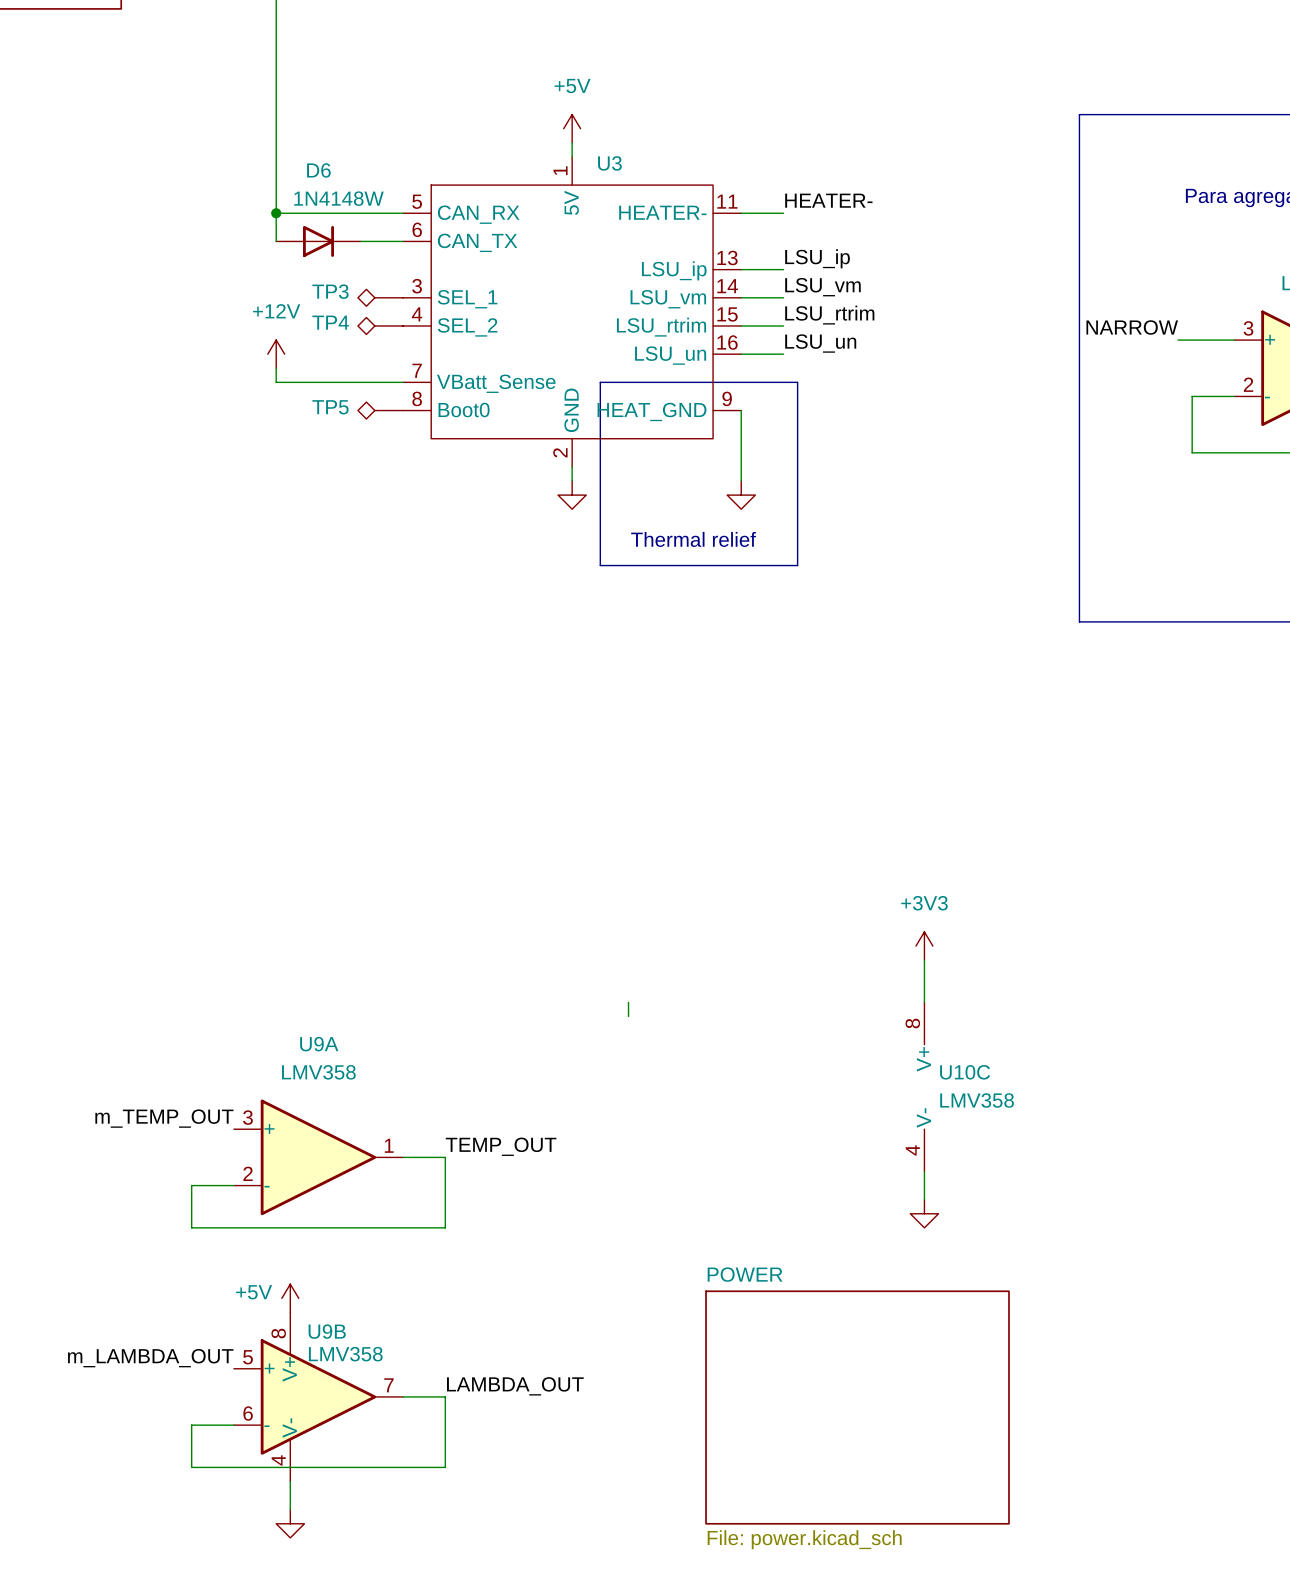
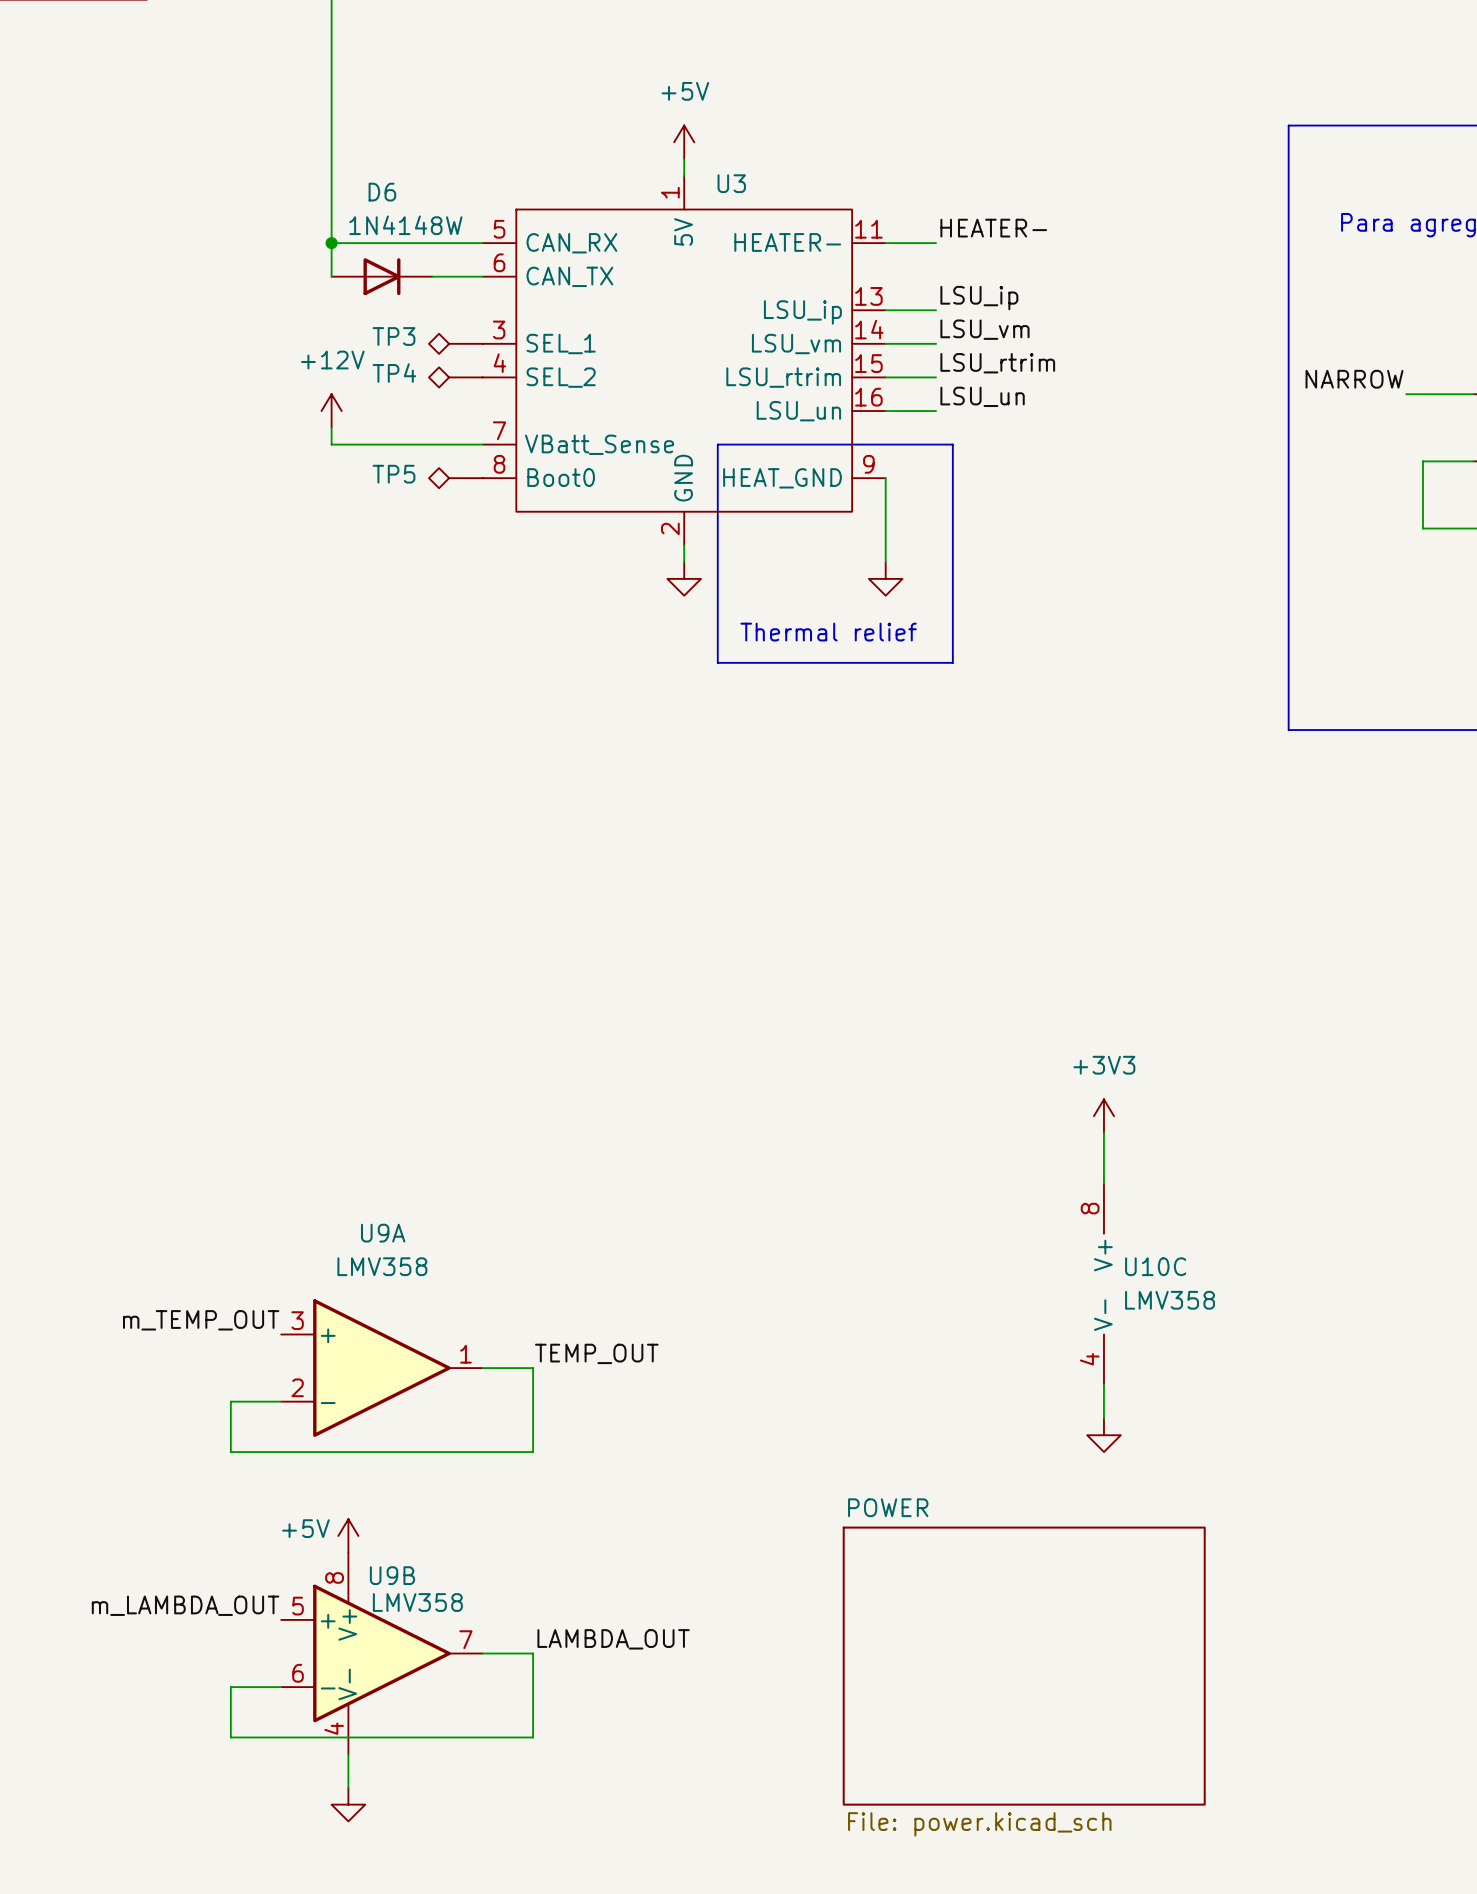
wire: (628, 1002) (628, 1016) -> none

